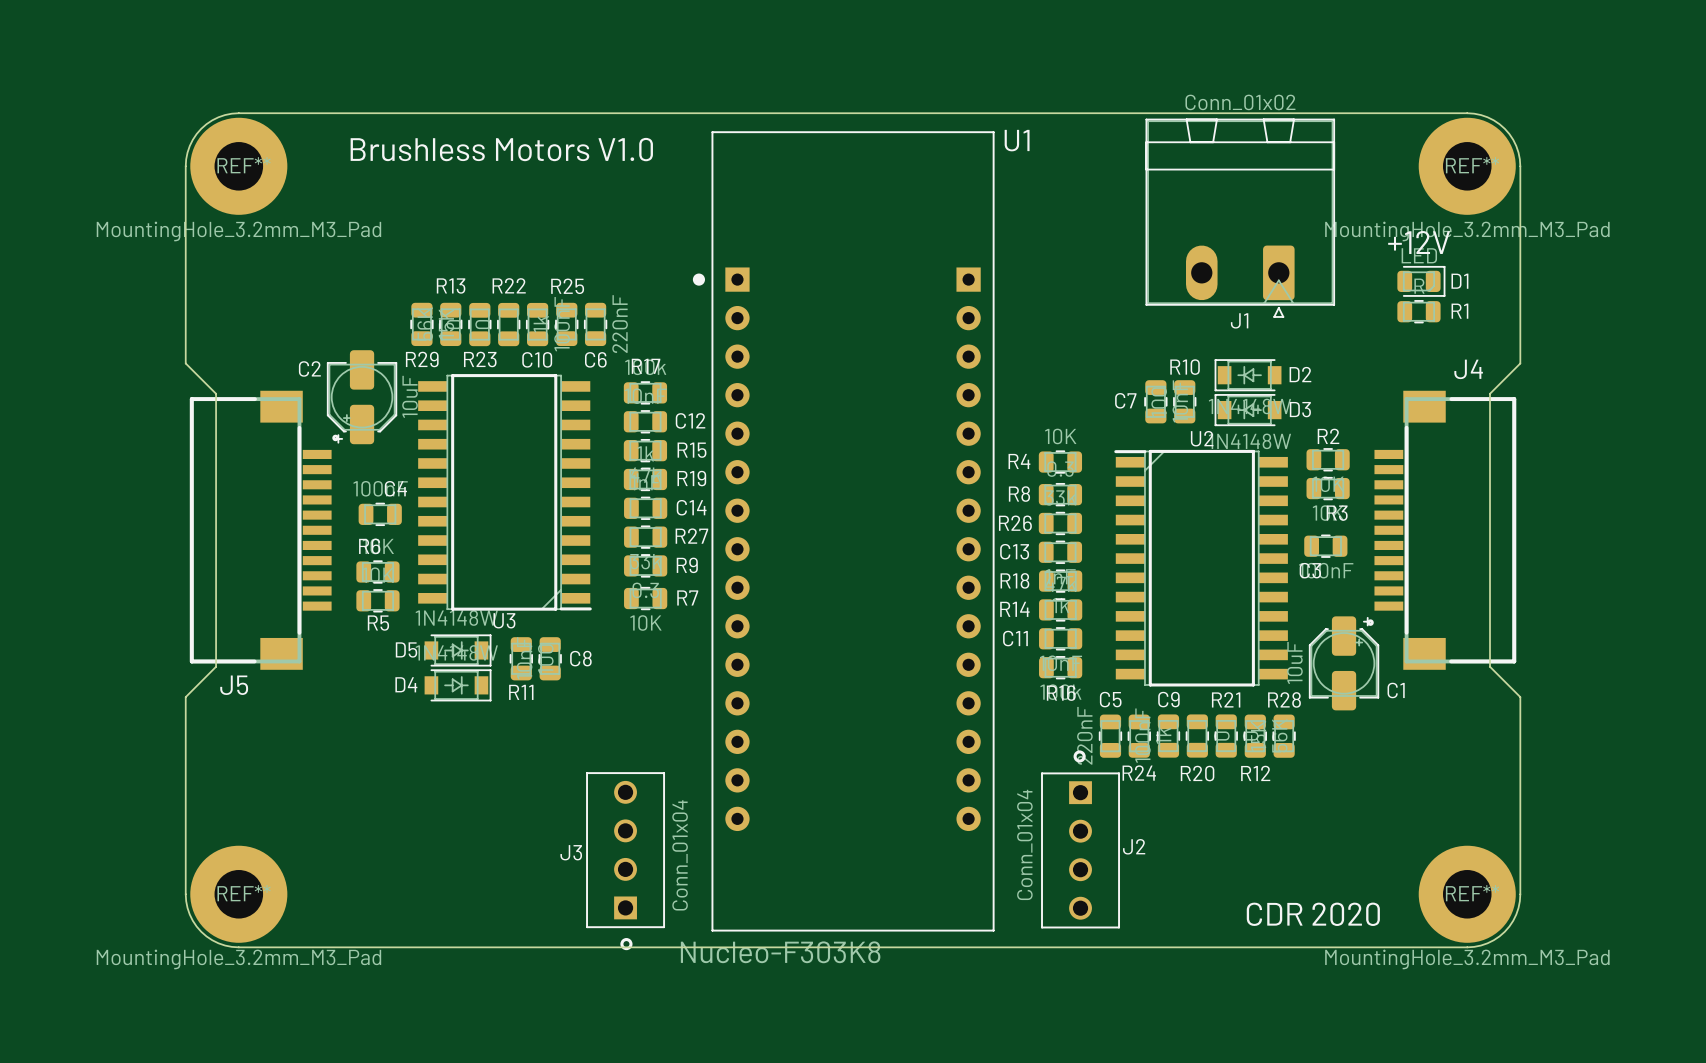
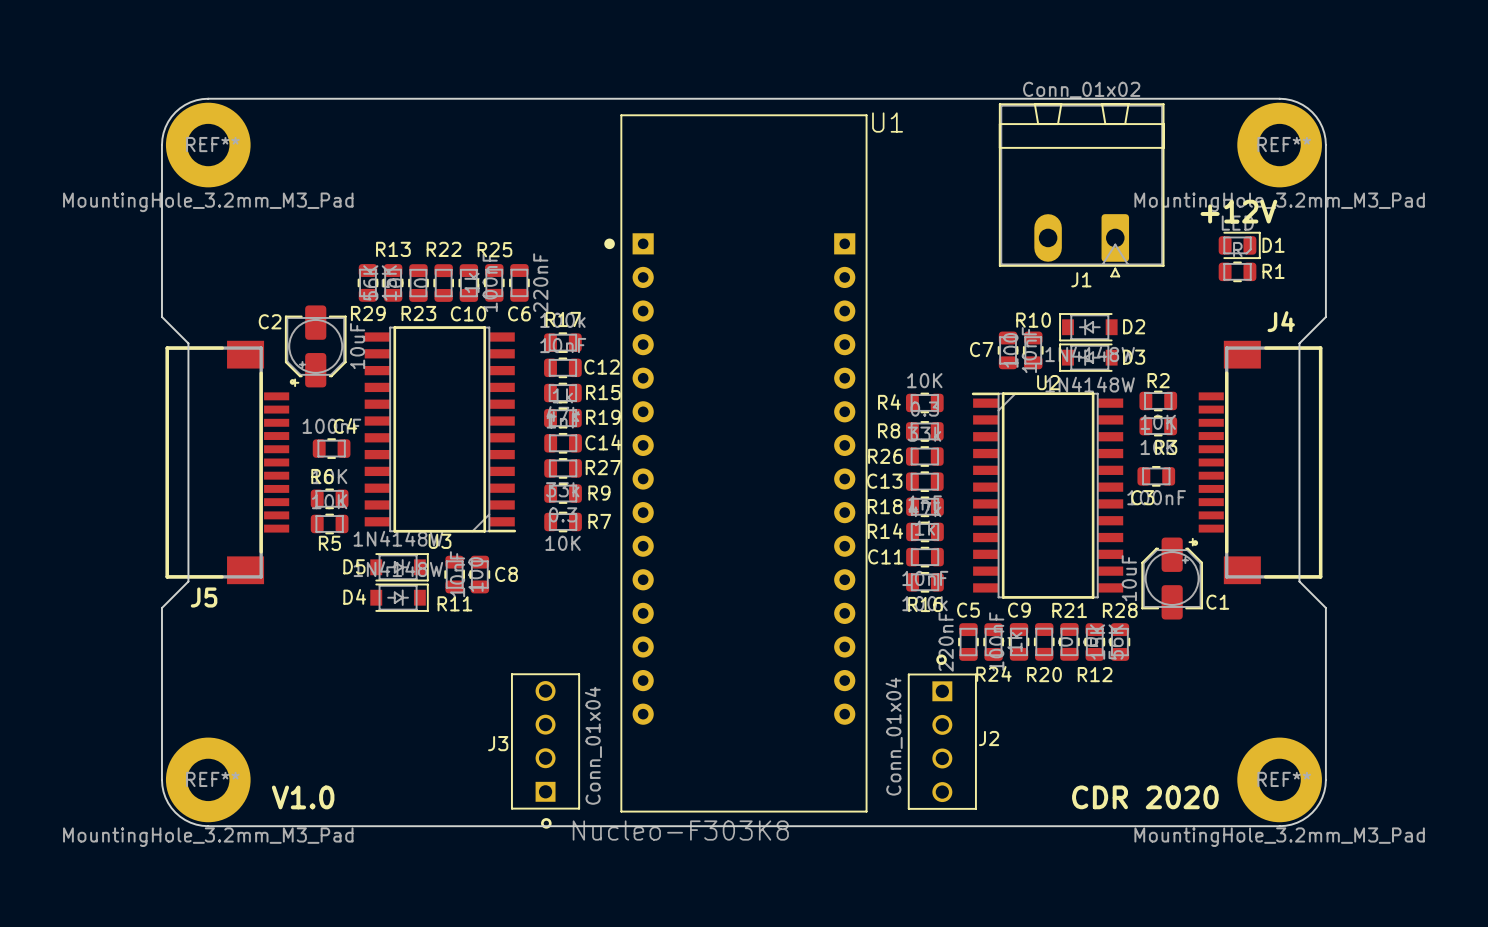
text: Brushless Motors V1.0 (501, 149) -> none
text: none -> V1.0 (303, 797)

